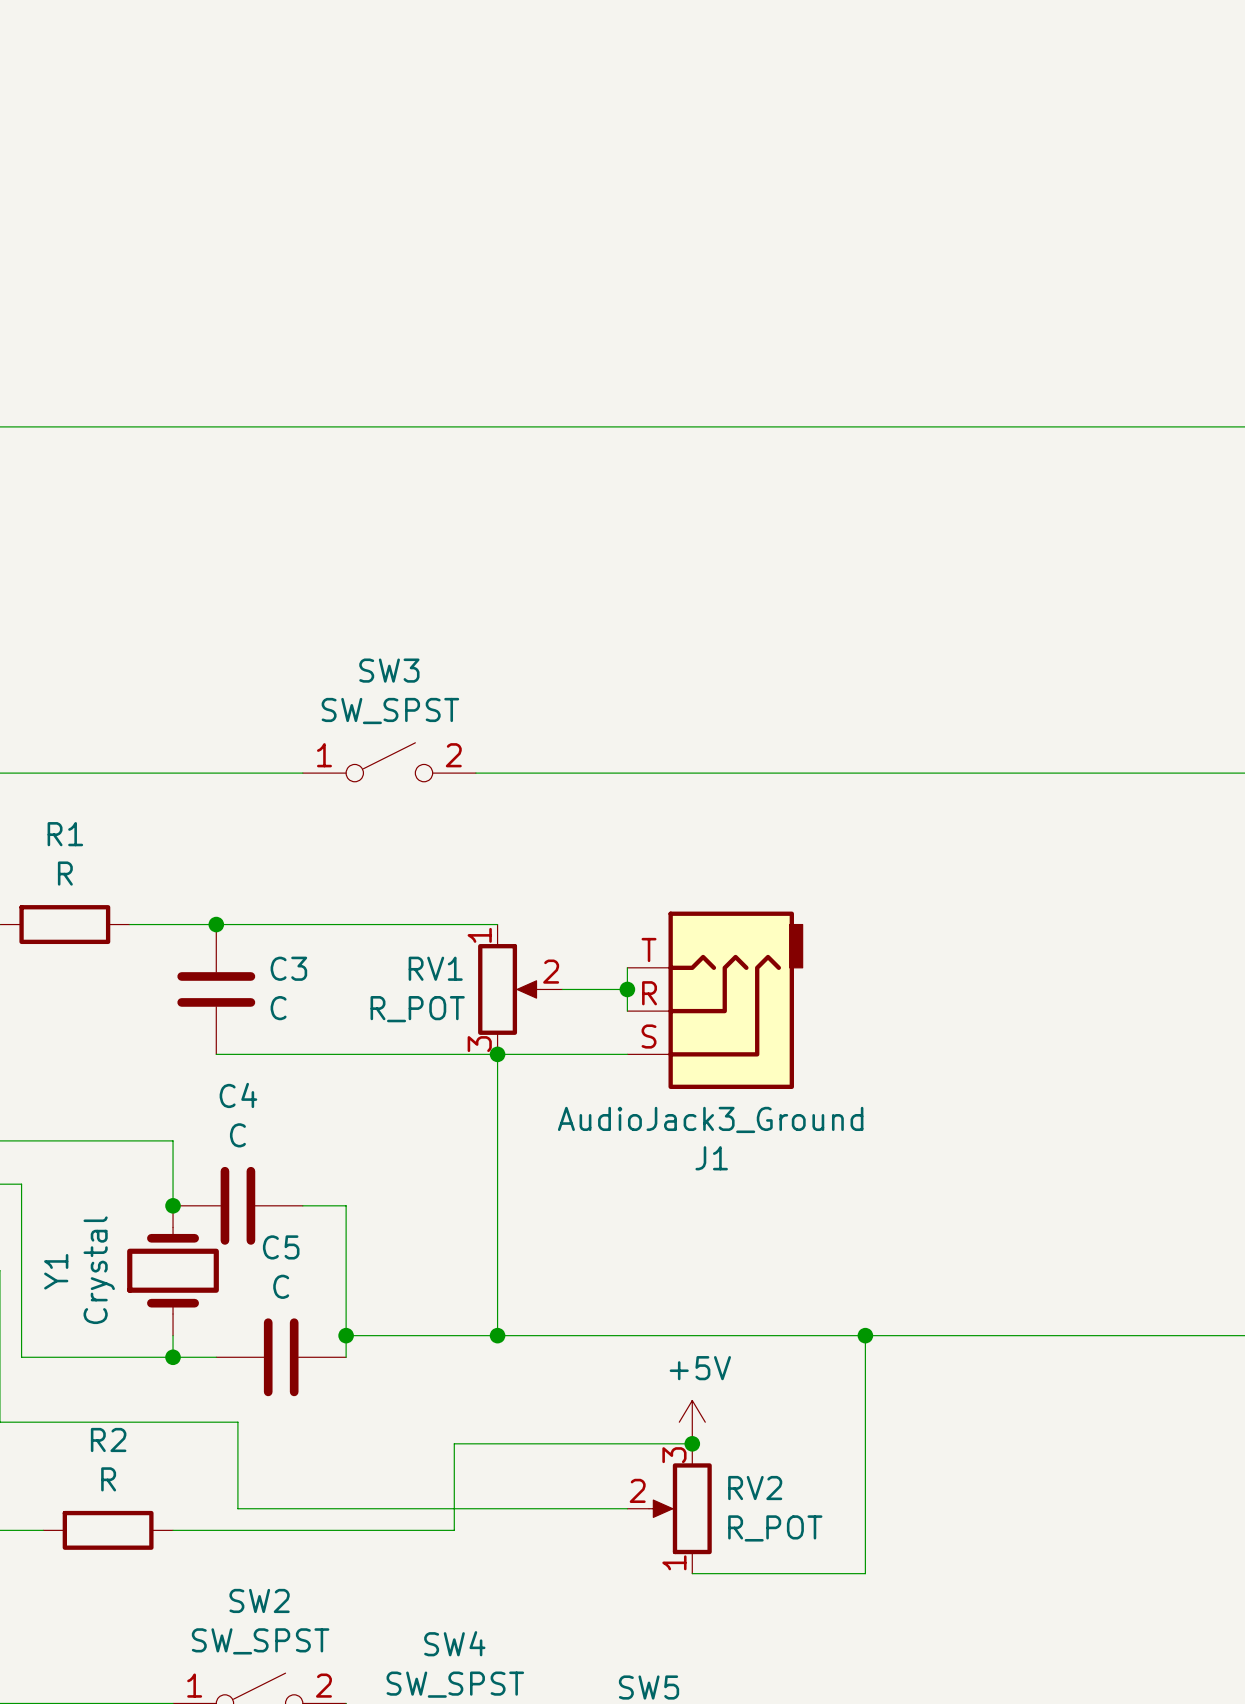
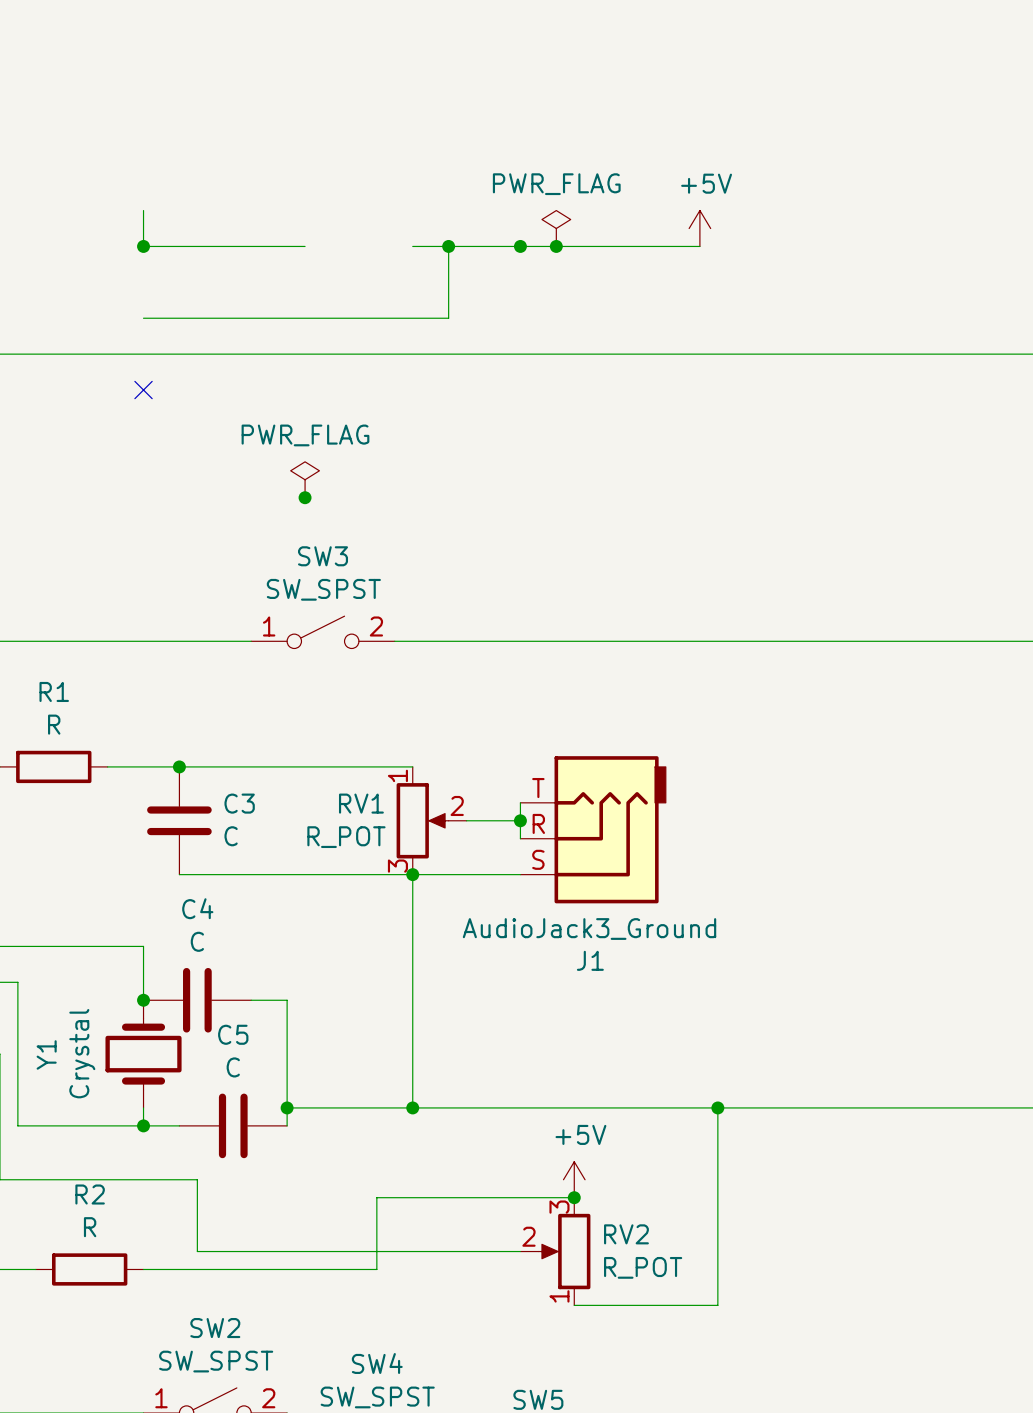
wire: none -> (143, 210) (143, 246) (305, 246)
power symbol: none -> PWR_FLAG (556, 228)
power symbol: none -> +5V (699, 228)
junction: none -> (143, 246)
wire: none -> (412, 246) (699, 246)
wire: none -> (448, 246) (448, 318) (143, 318)
junction: none -> (448, 246)
junction: none -> (520, 246)
junction: none -> (556, 246)
no-connect mark: none -> (143, 390)
power symbol: none -> PWR_FLAG (305, 479)
junction: none -> (305, 497)

